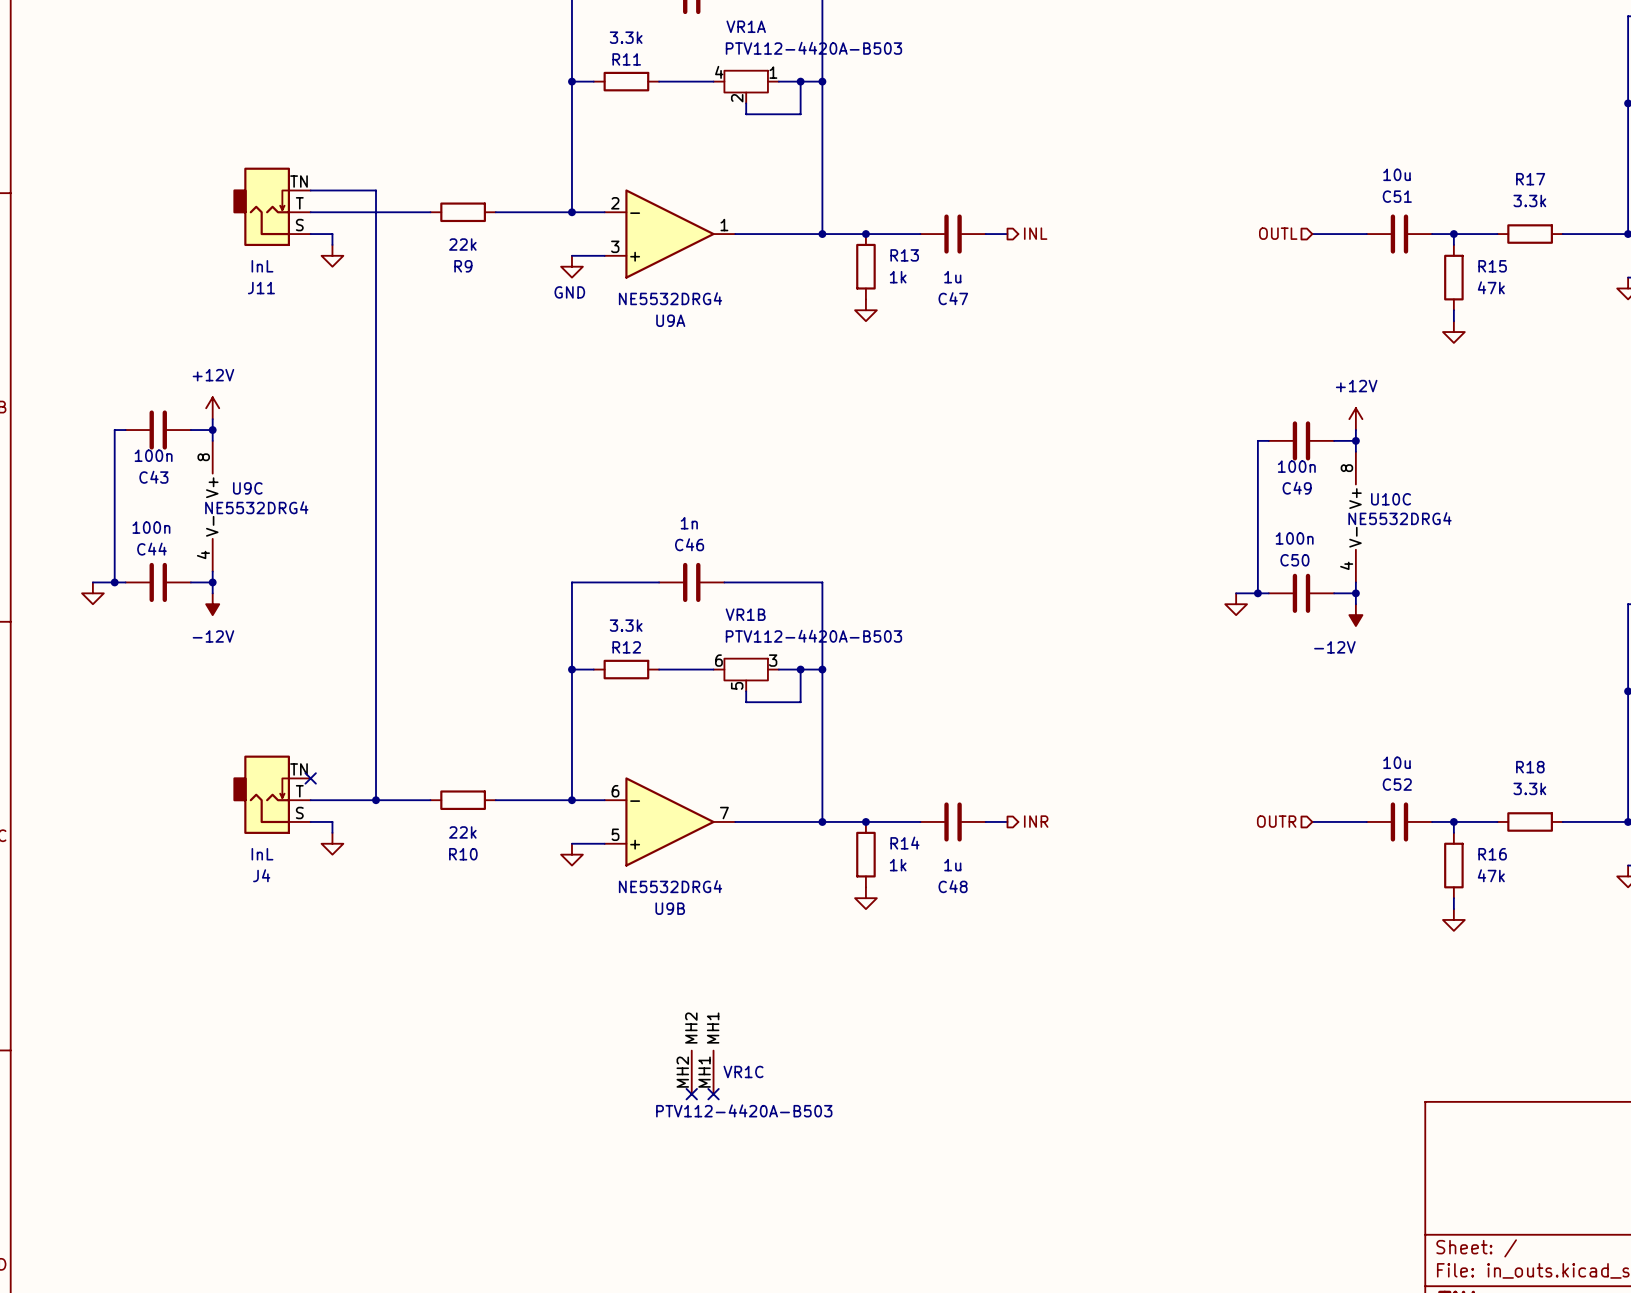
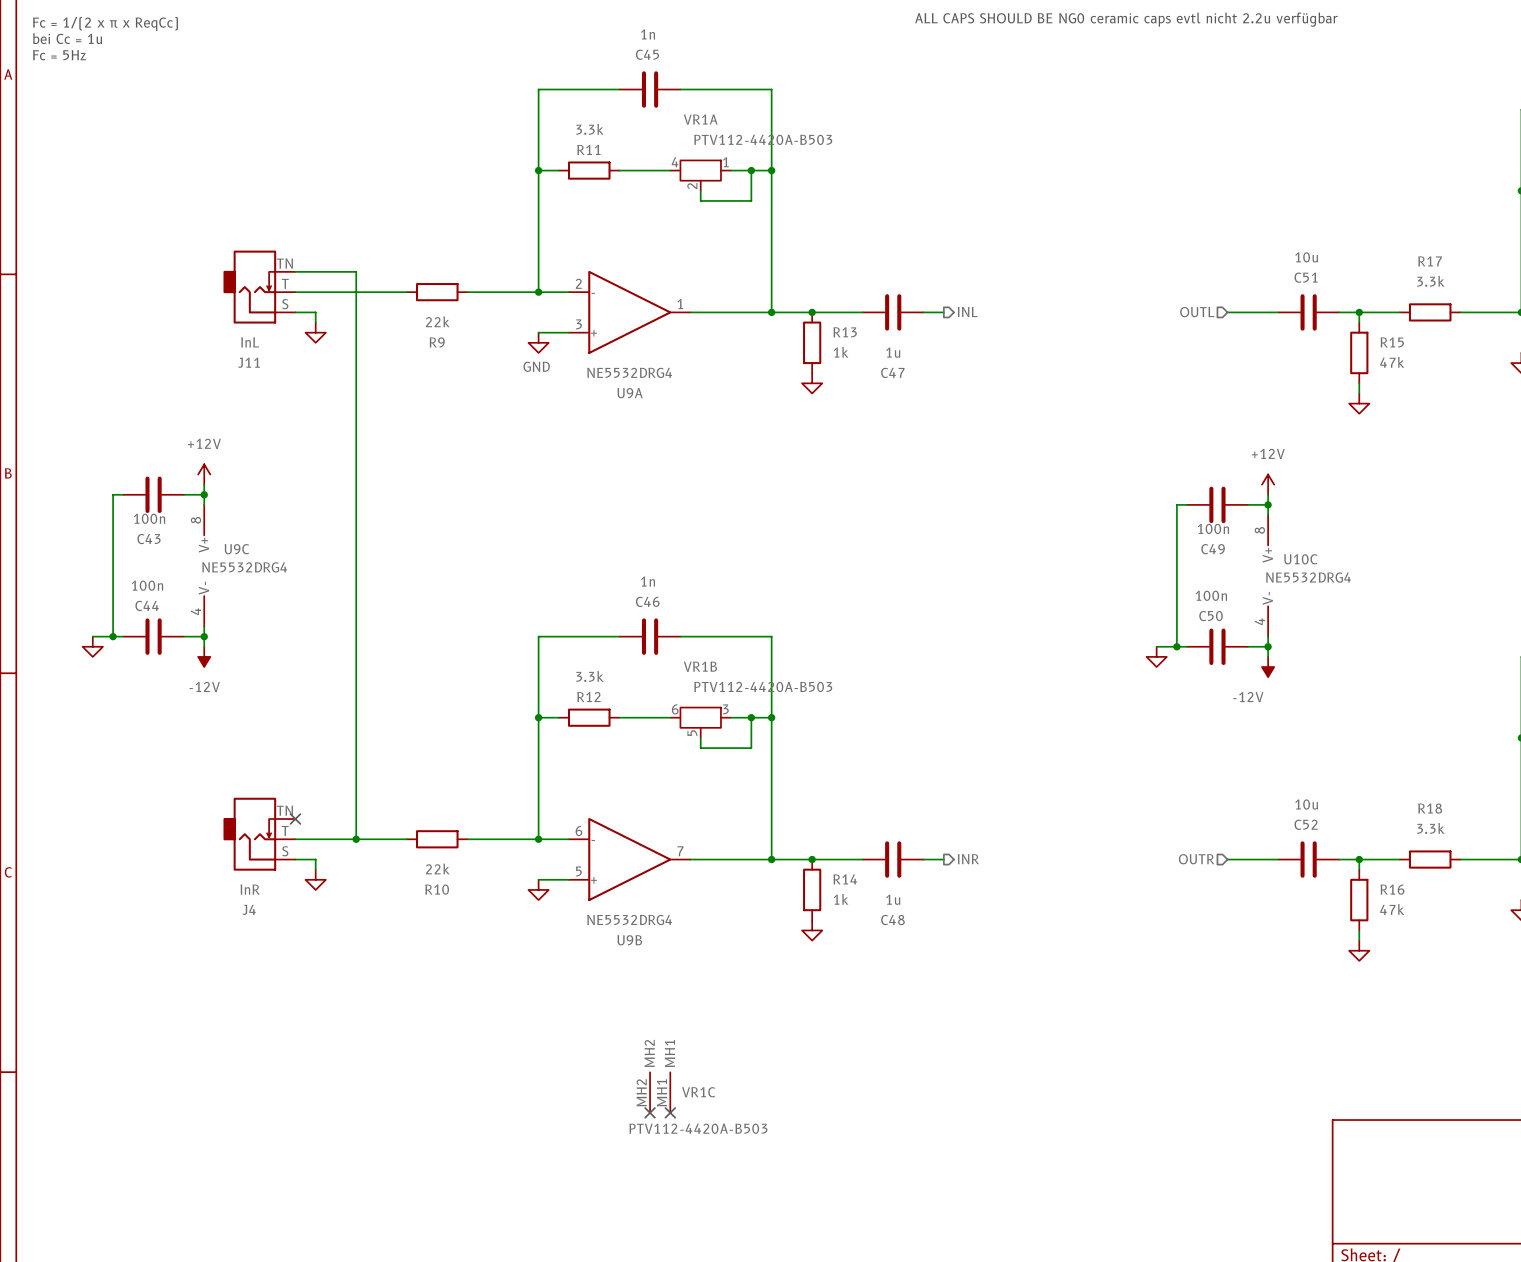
J4 value: InL (262, 854) -> InR (250, 889)

